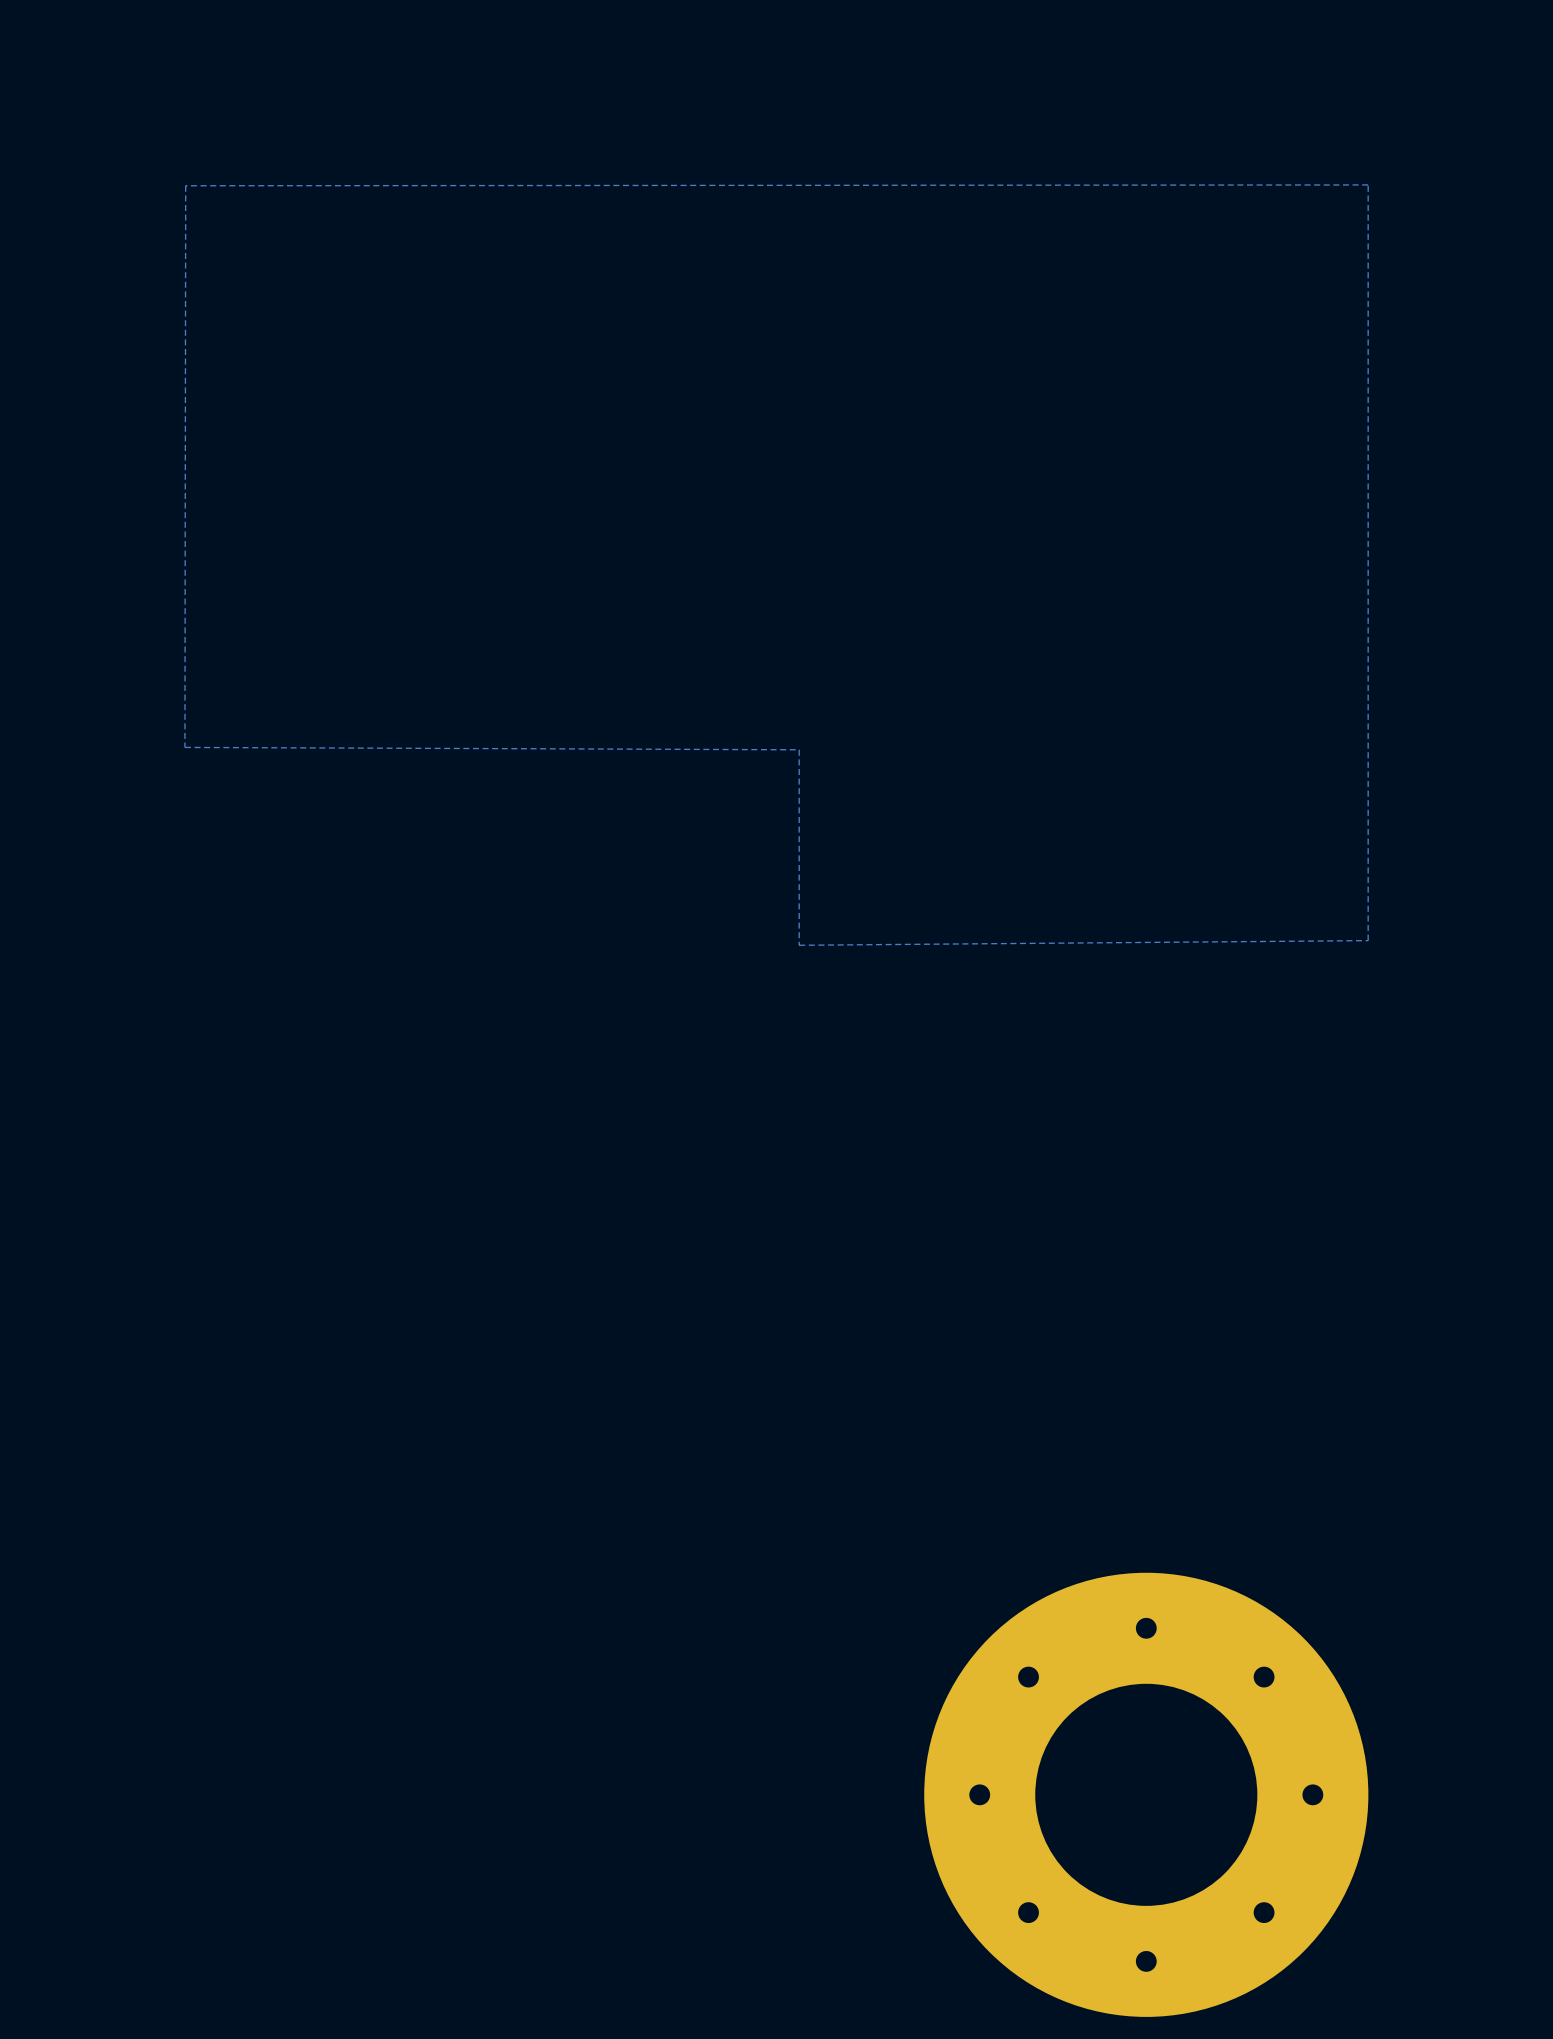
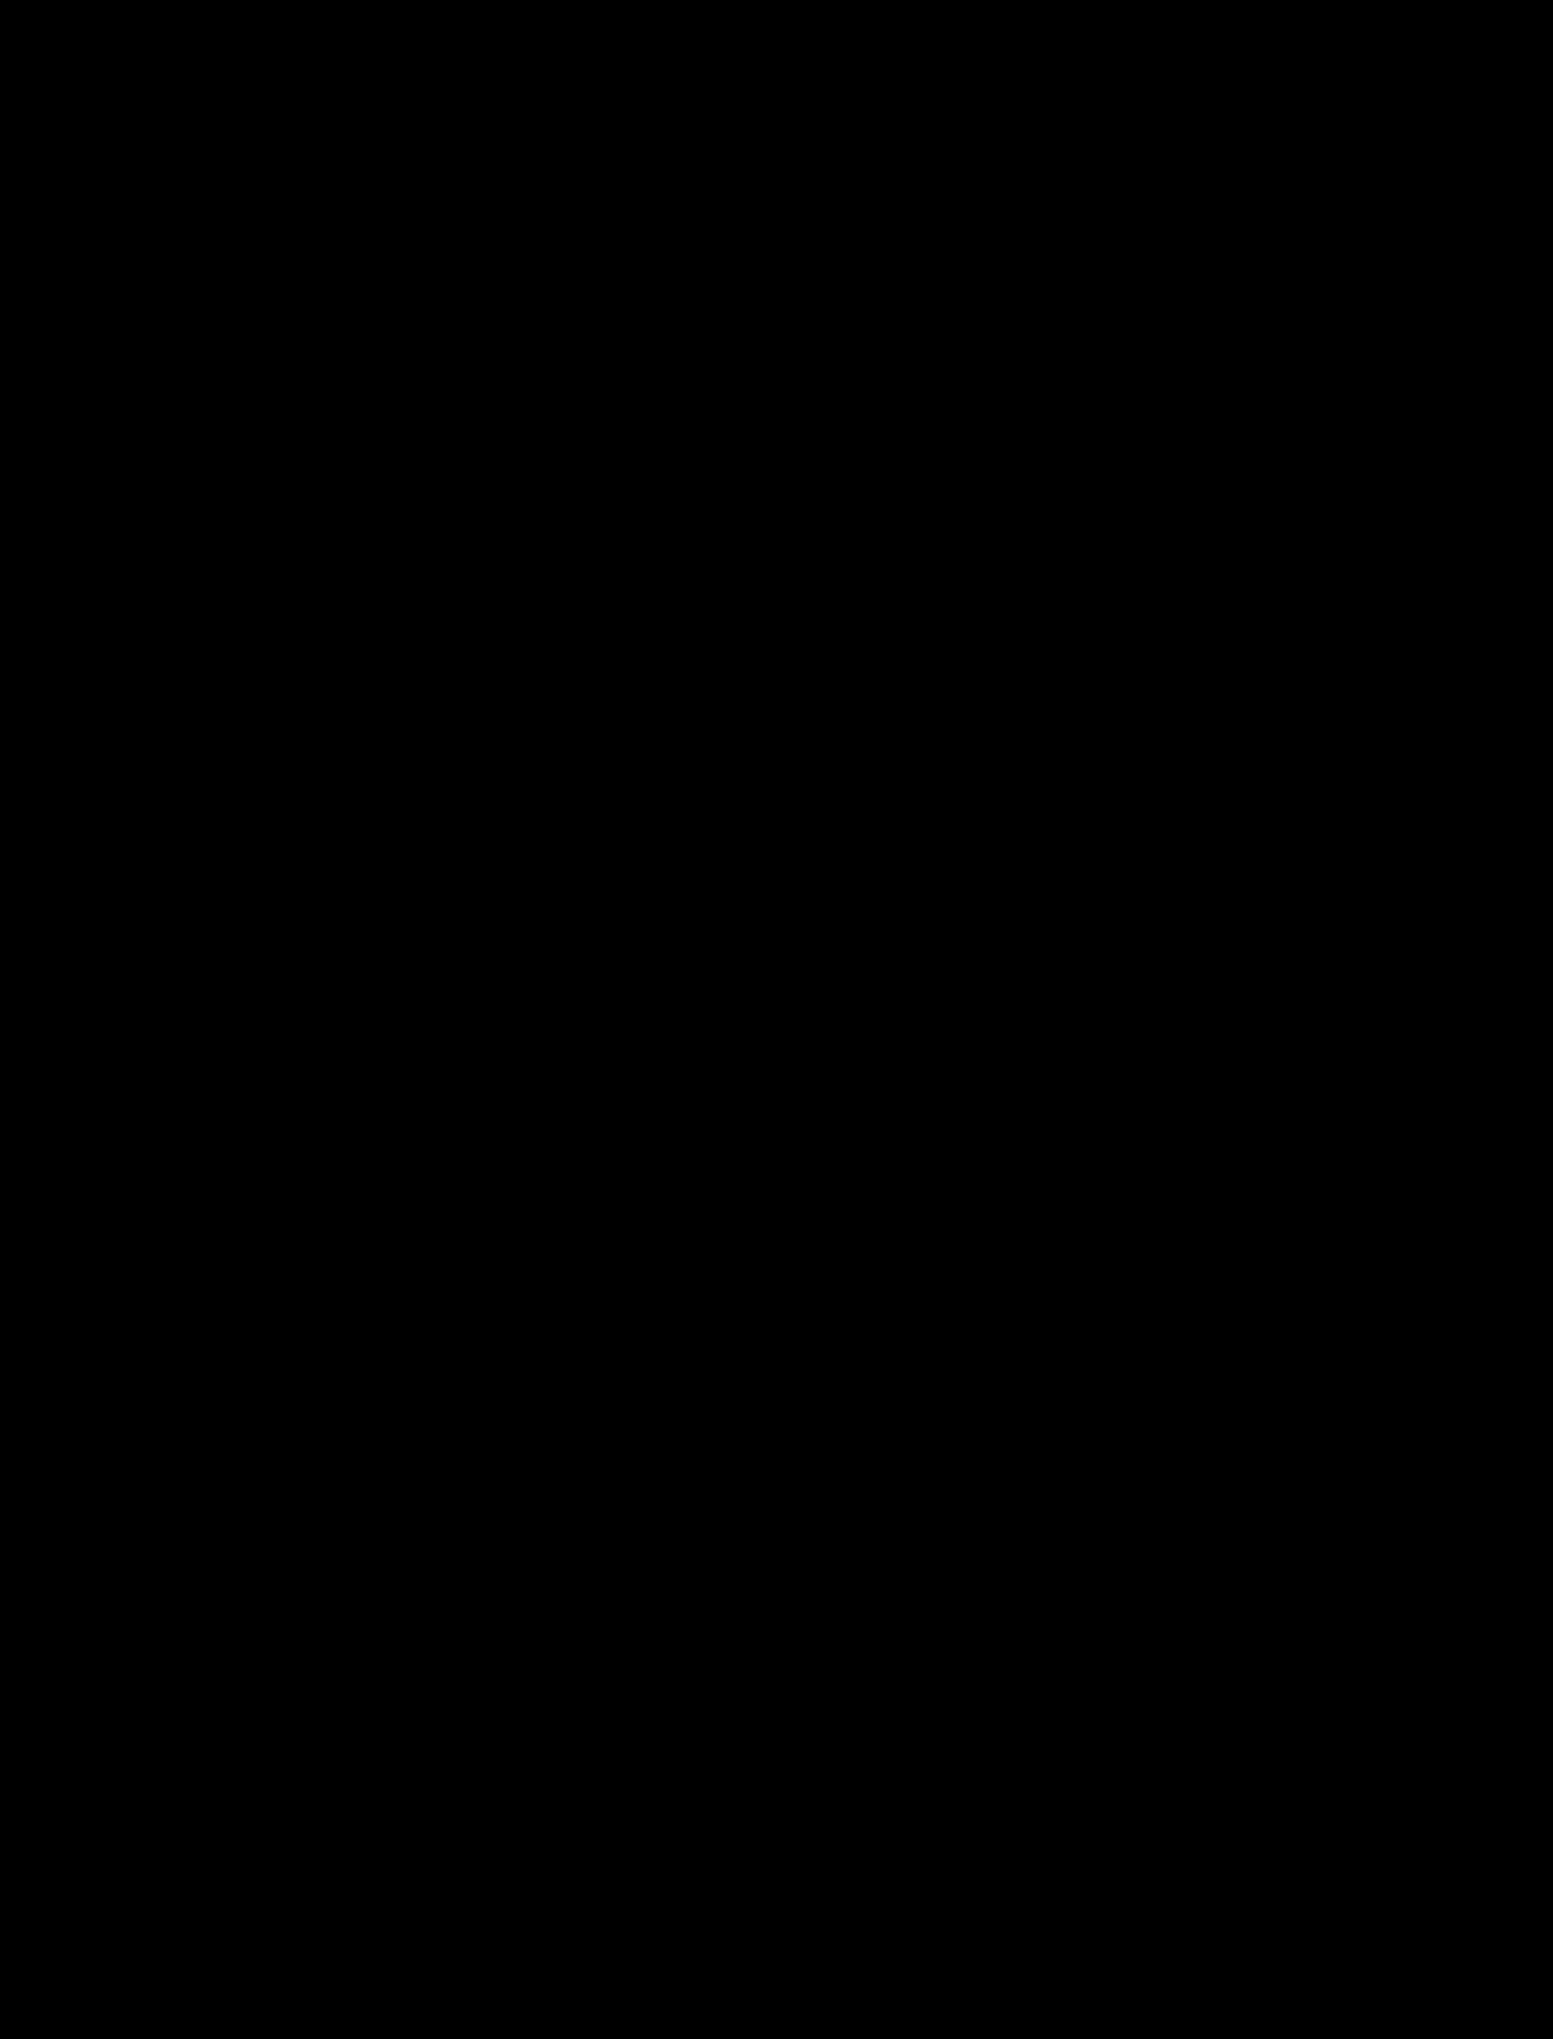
zone outline: (1368, 184) (185, 185) (184, 747) (799, 749) (799, 945) (1368, 940) (1368, 184) -> none
part: (1146, 1794) -> none

